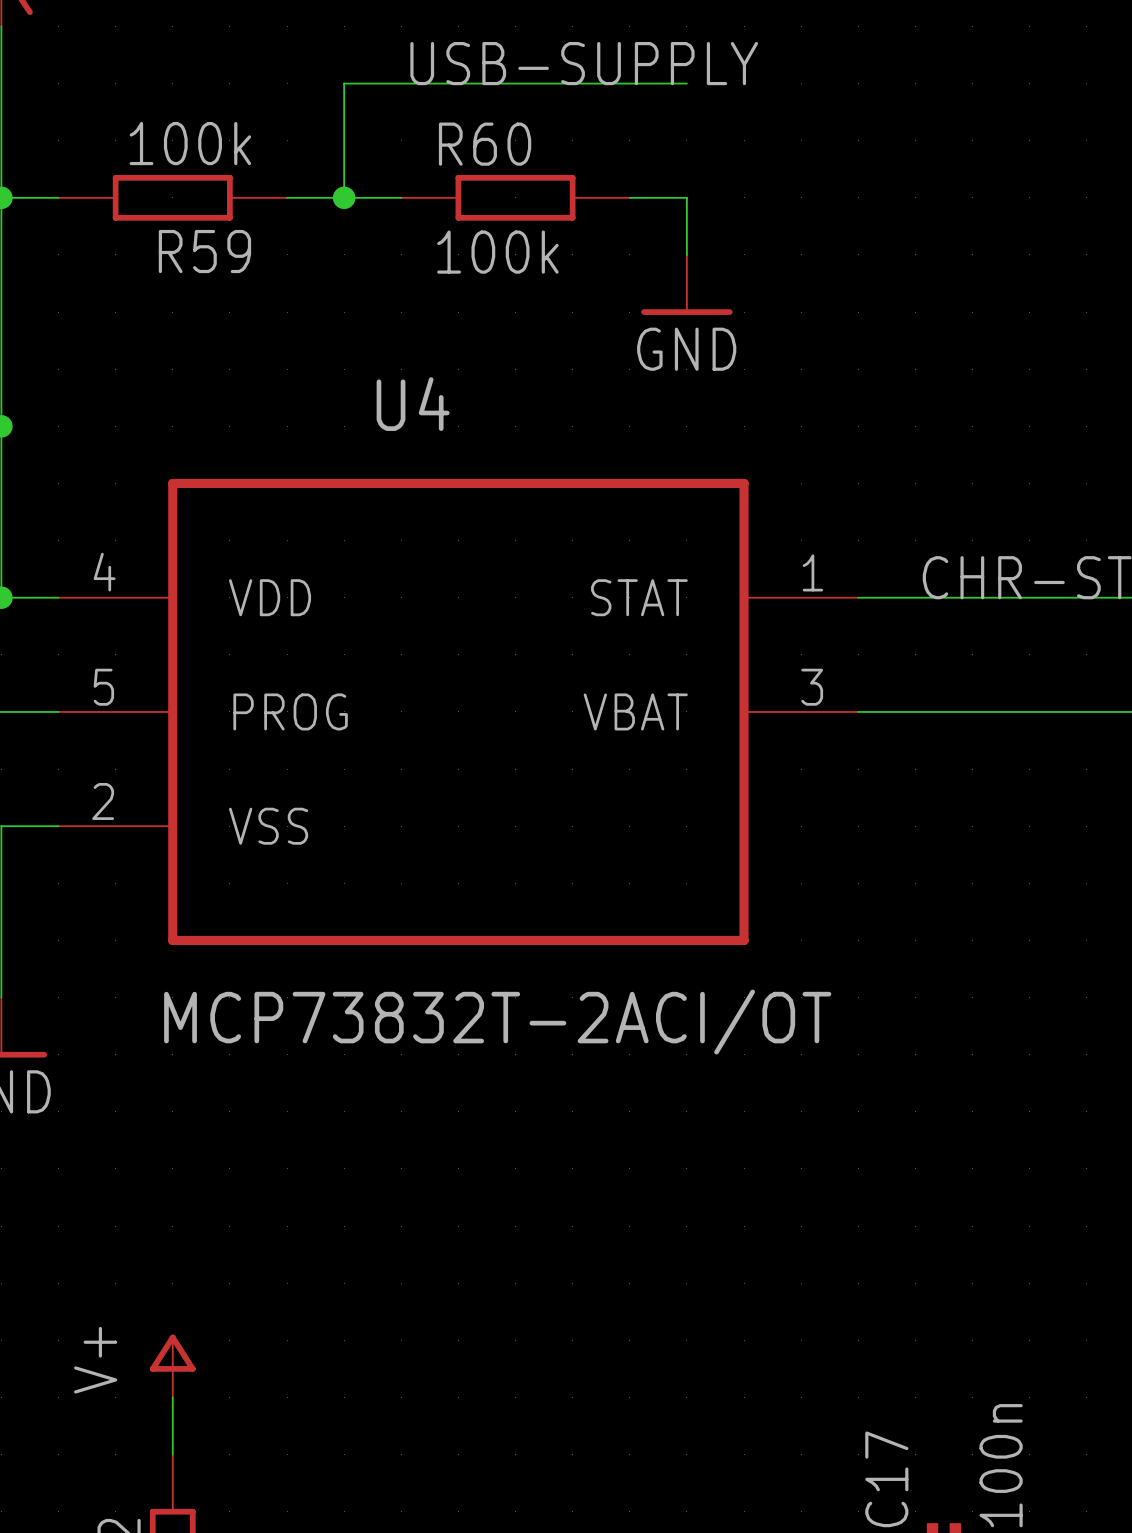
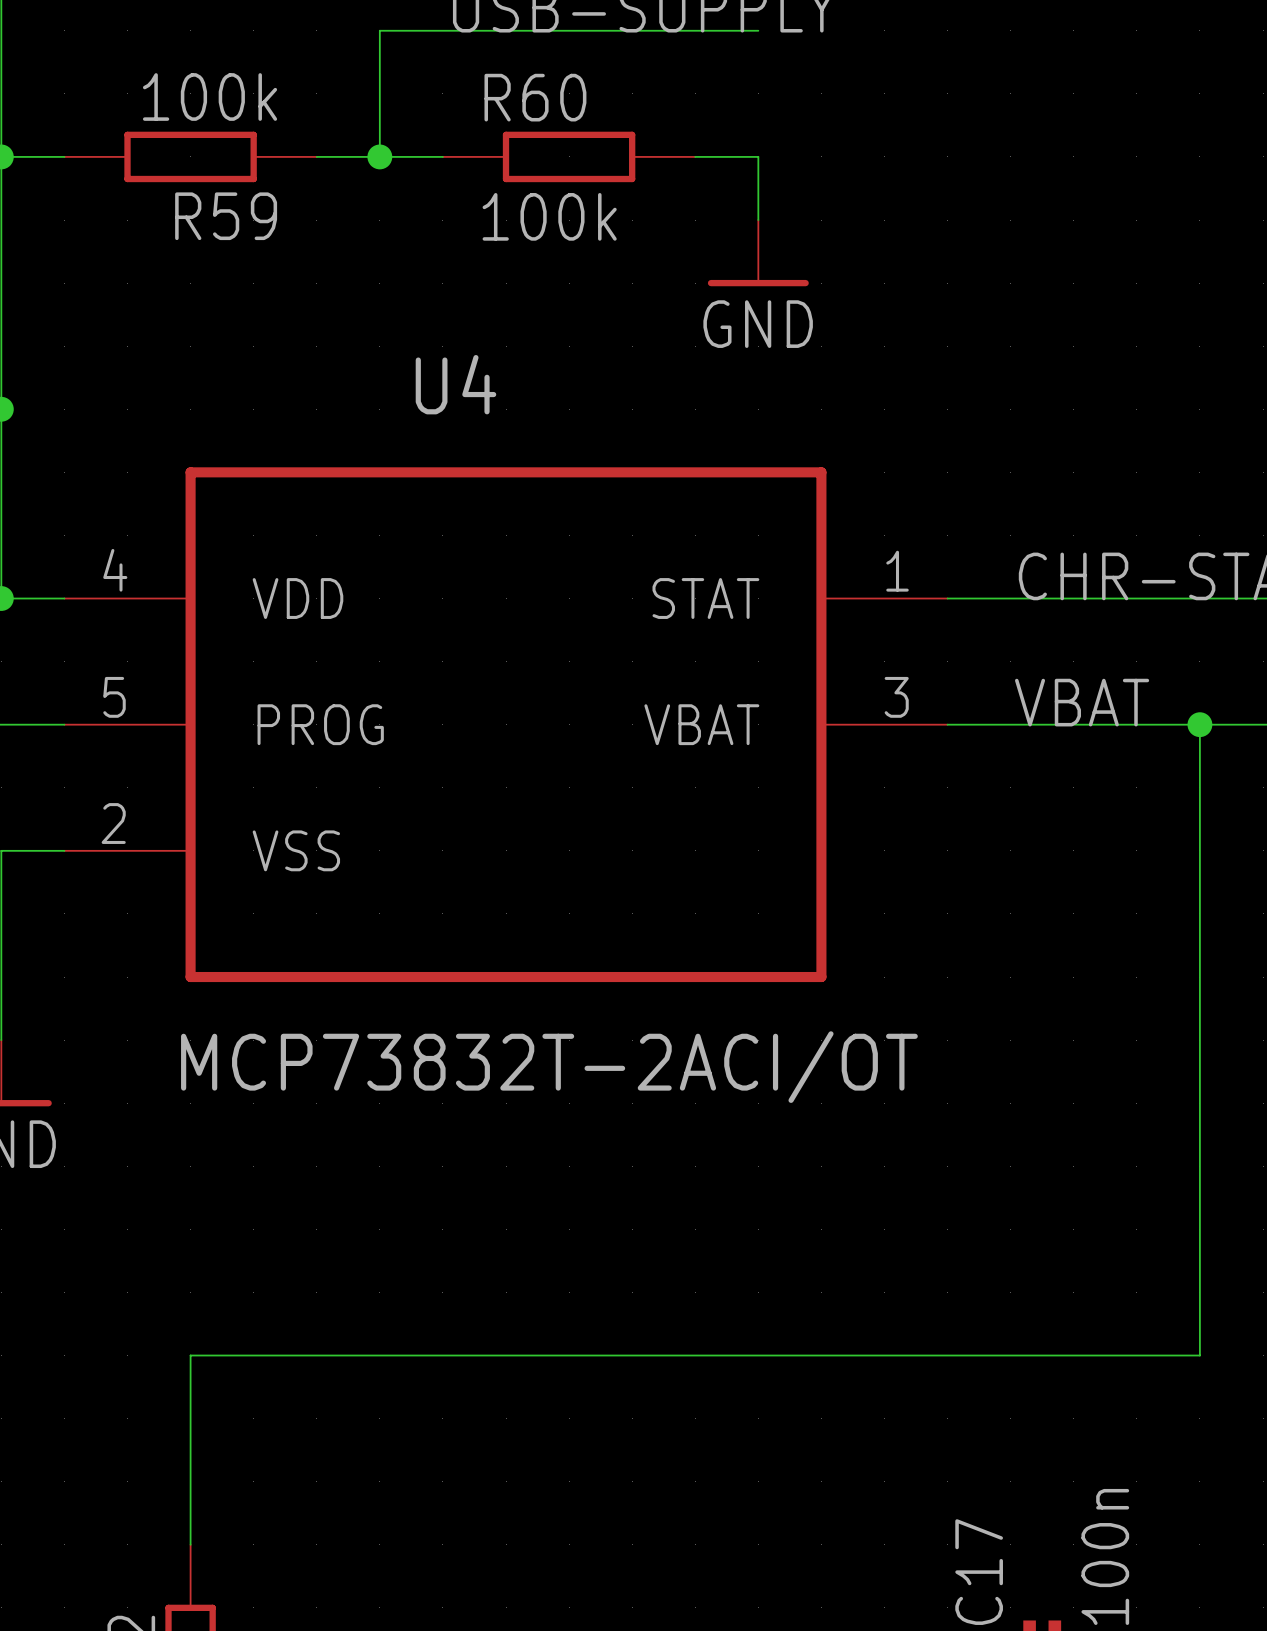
label: none -> VBAT (1082, 702)
wire: none -> (1199, 724) (1199, 1355) (190, 1355) (190, 1481)
junction: none -> (1199, 724)
power symbol: V+ (172, 1366) -> none

